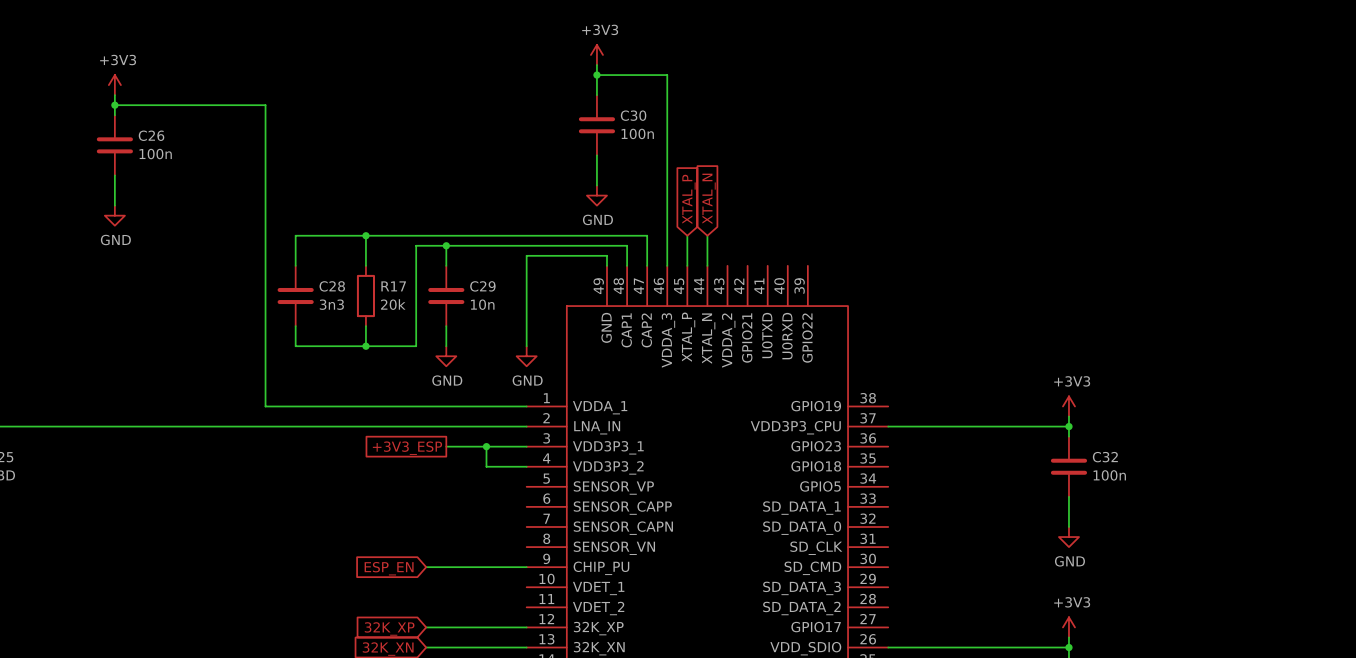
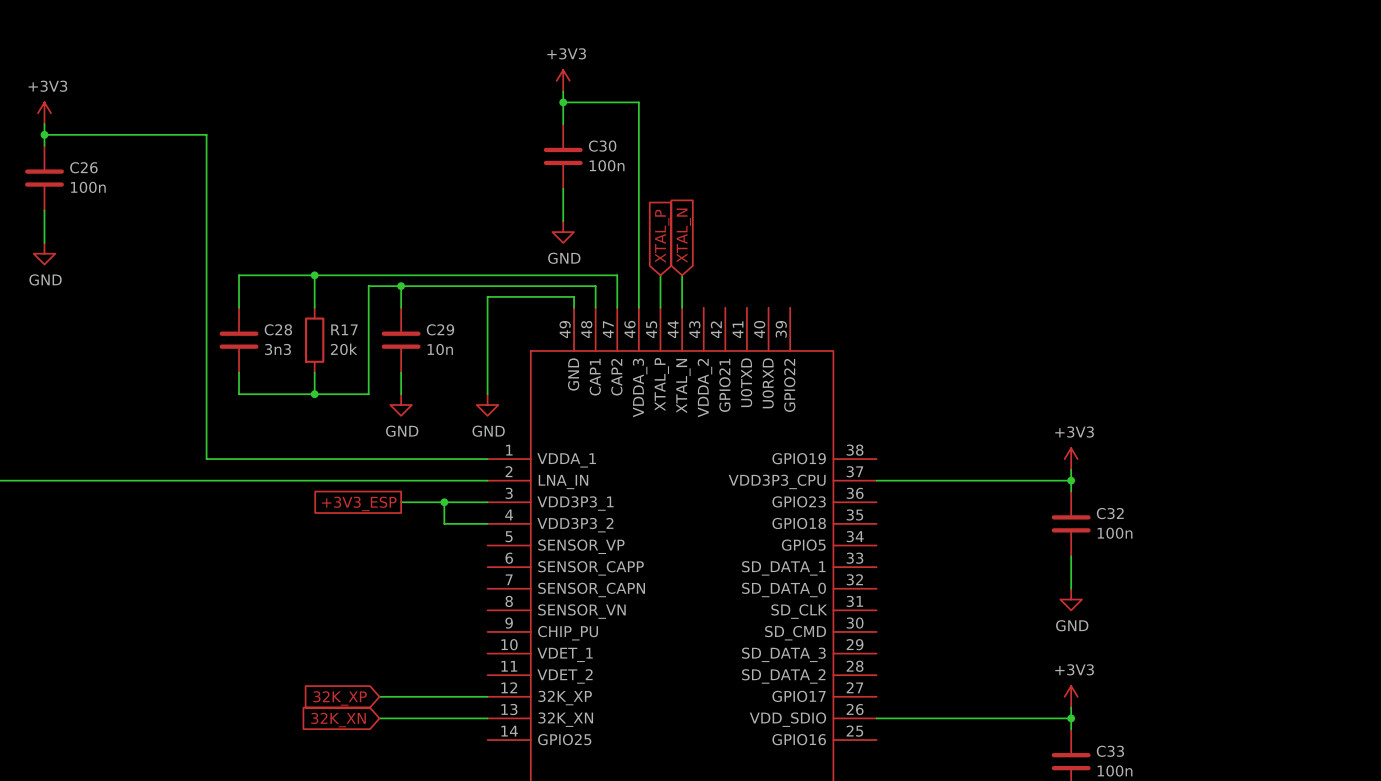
wire: (426, 567) (526, 567) -> none
global label: ESP_EN (389, 568) -> none

